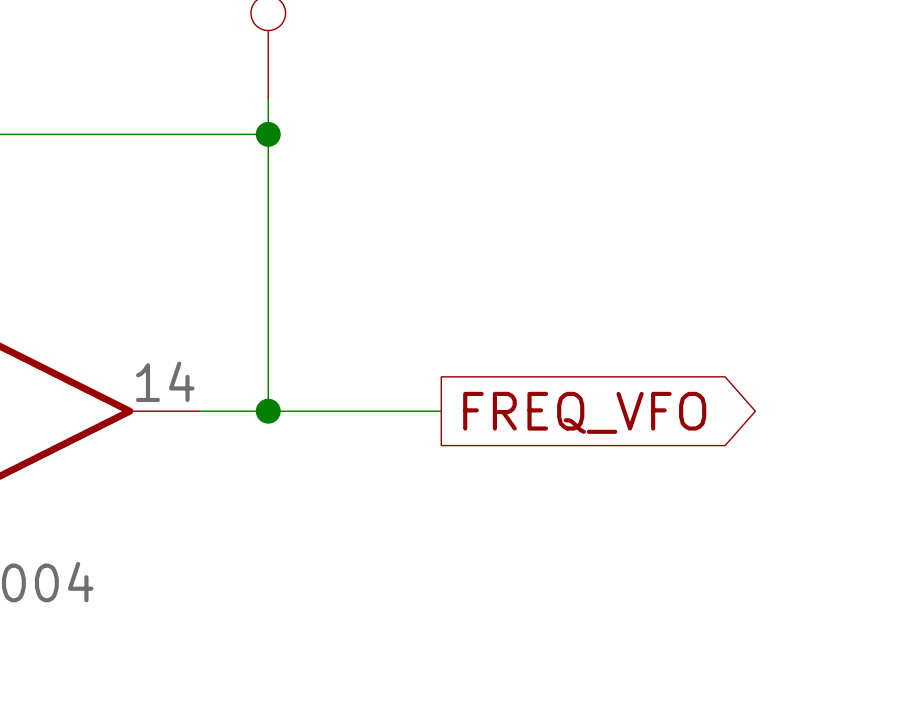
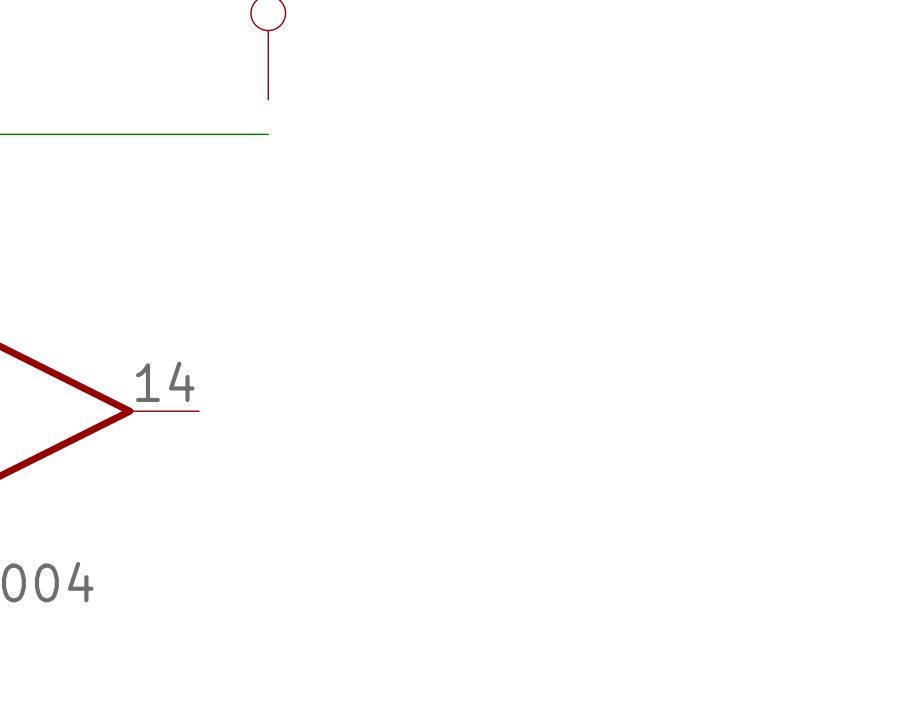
wire: (268, 99) (268, 411) -> none
junction: (268, 134) -> none
wire: (199, 411) (441, 411) -> none
junction: (268, 411) -> none
global label: FREQ_VFO (584, 412) -> none

